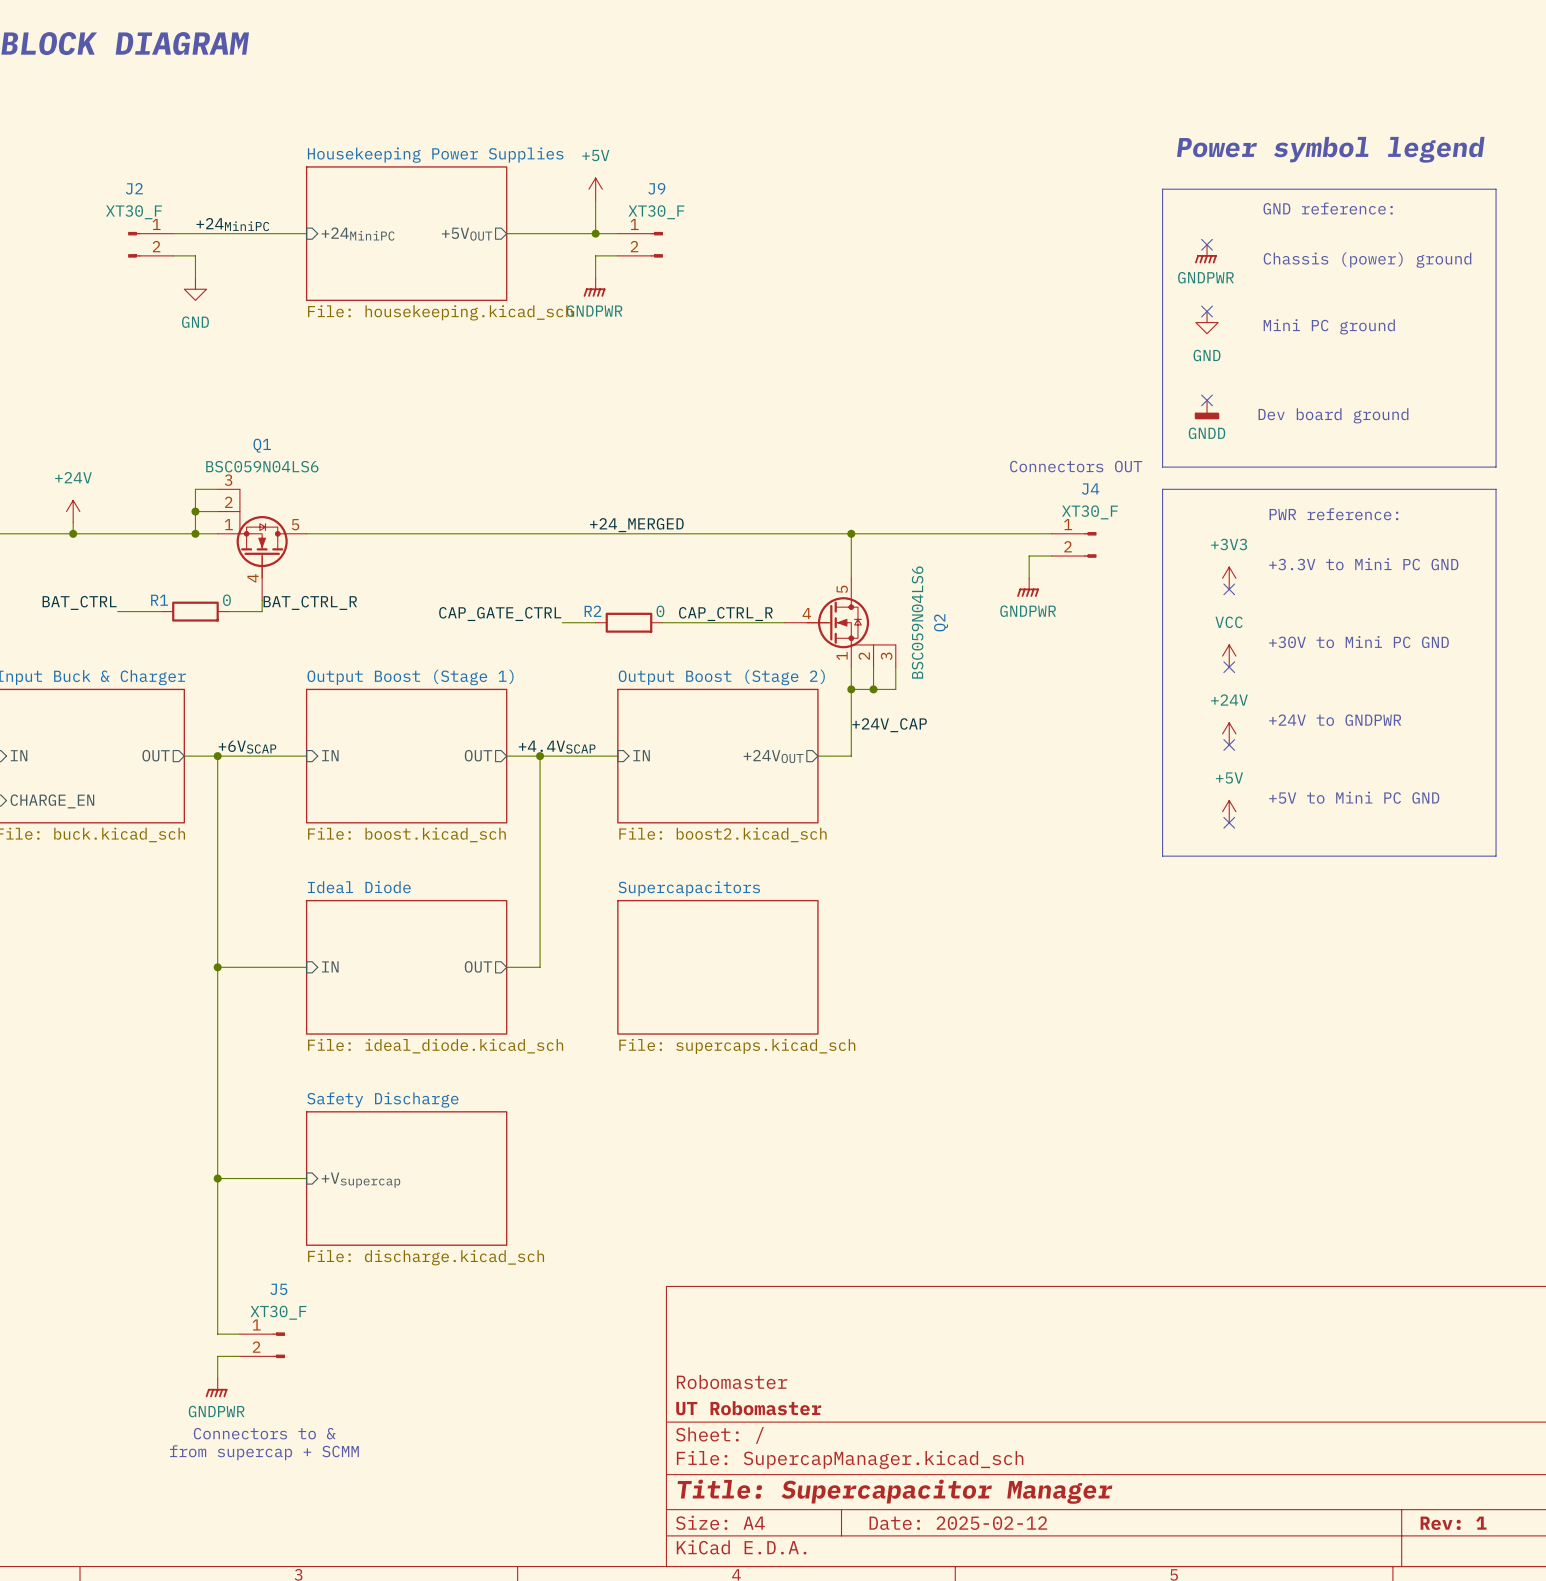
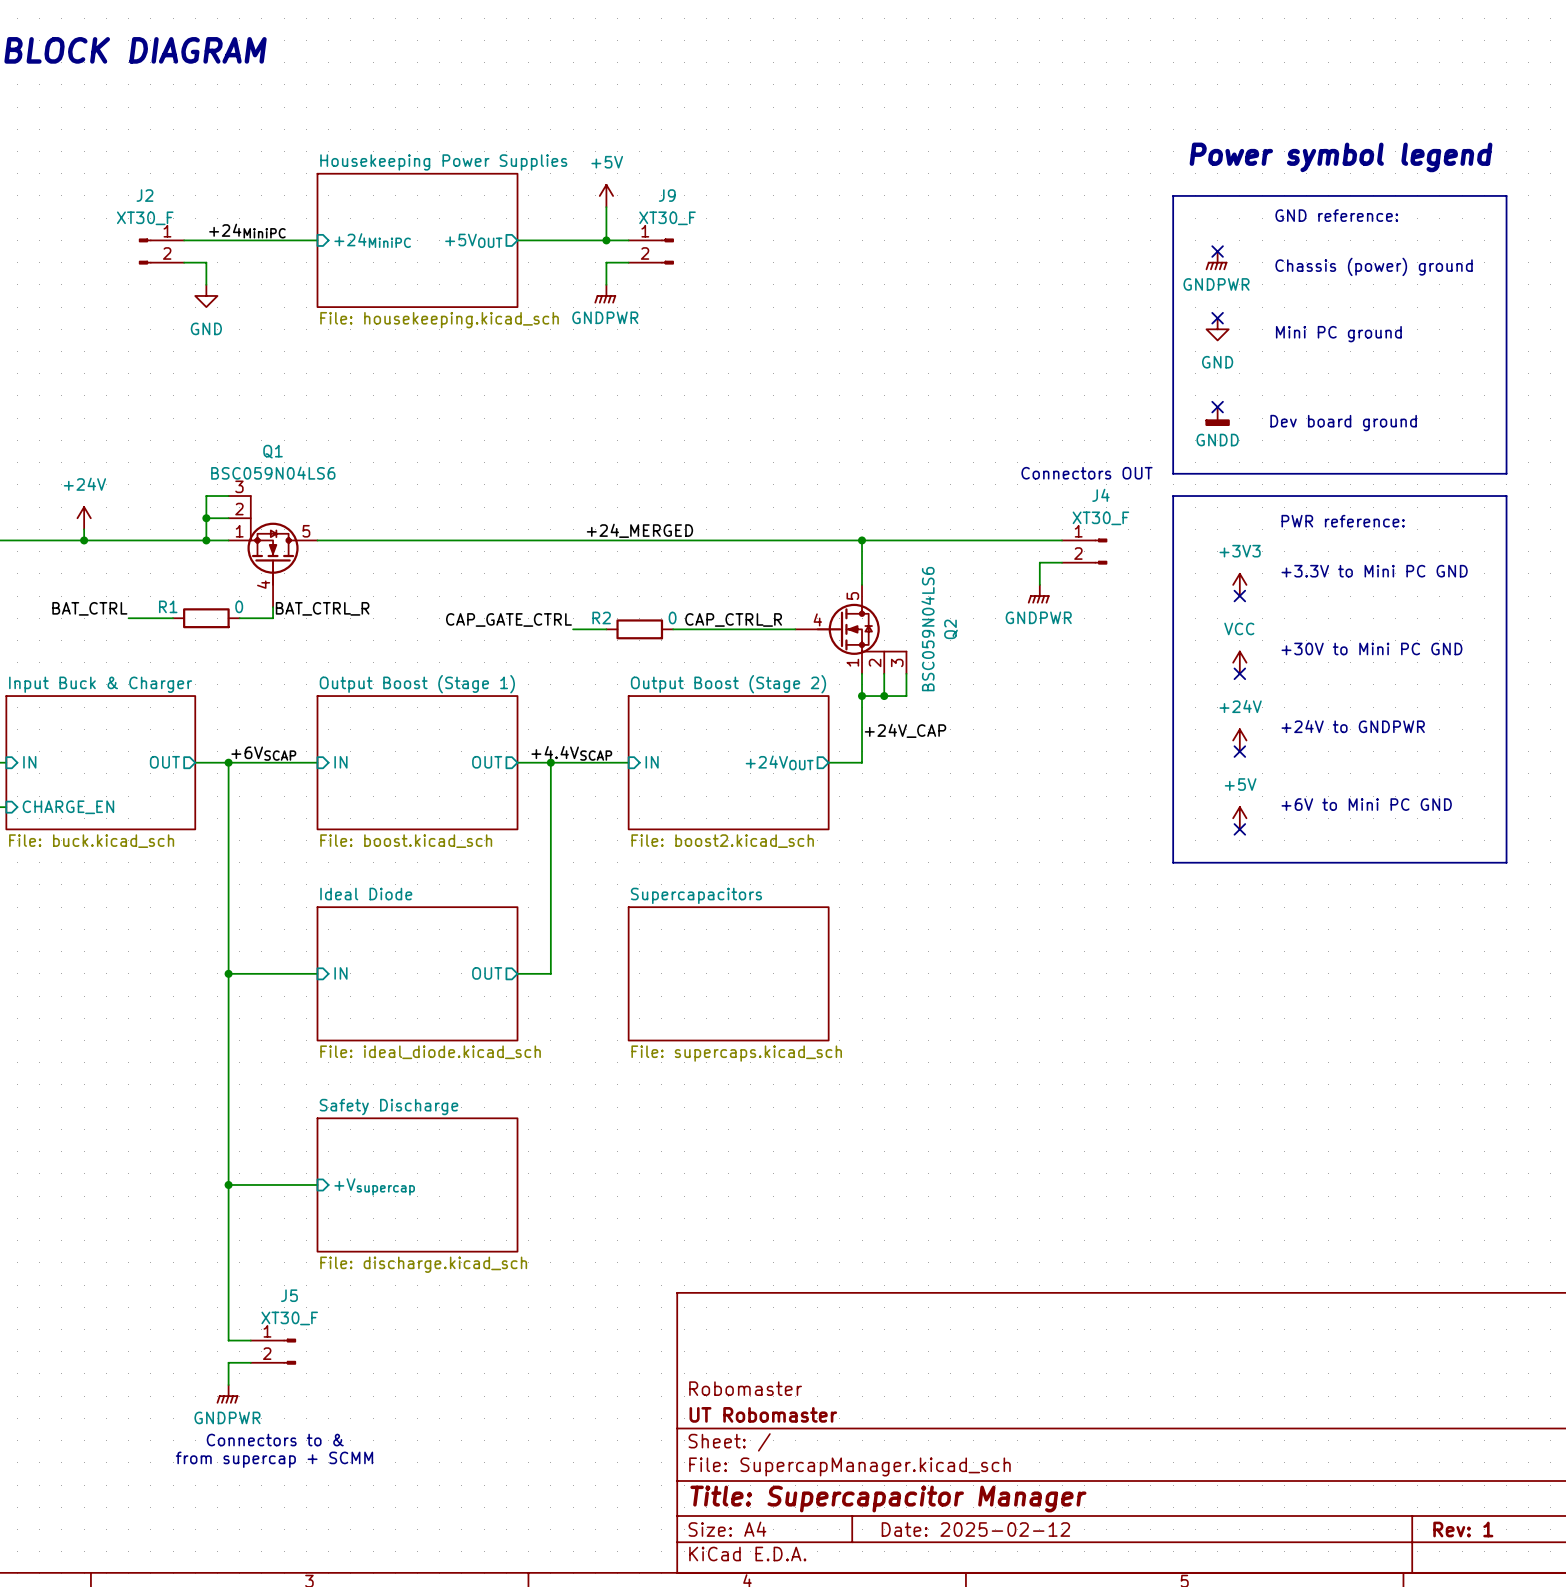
text: +5V to Mini PC GND (1354, 797) -> +6V to Mini PC GND (1366, 804)

